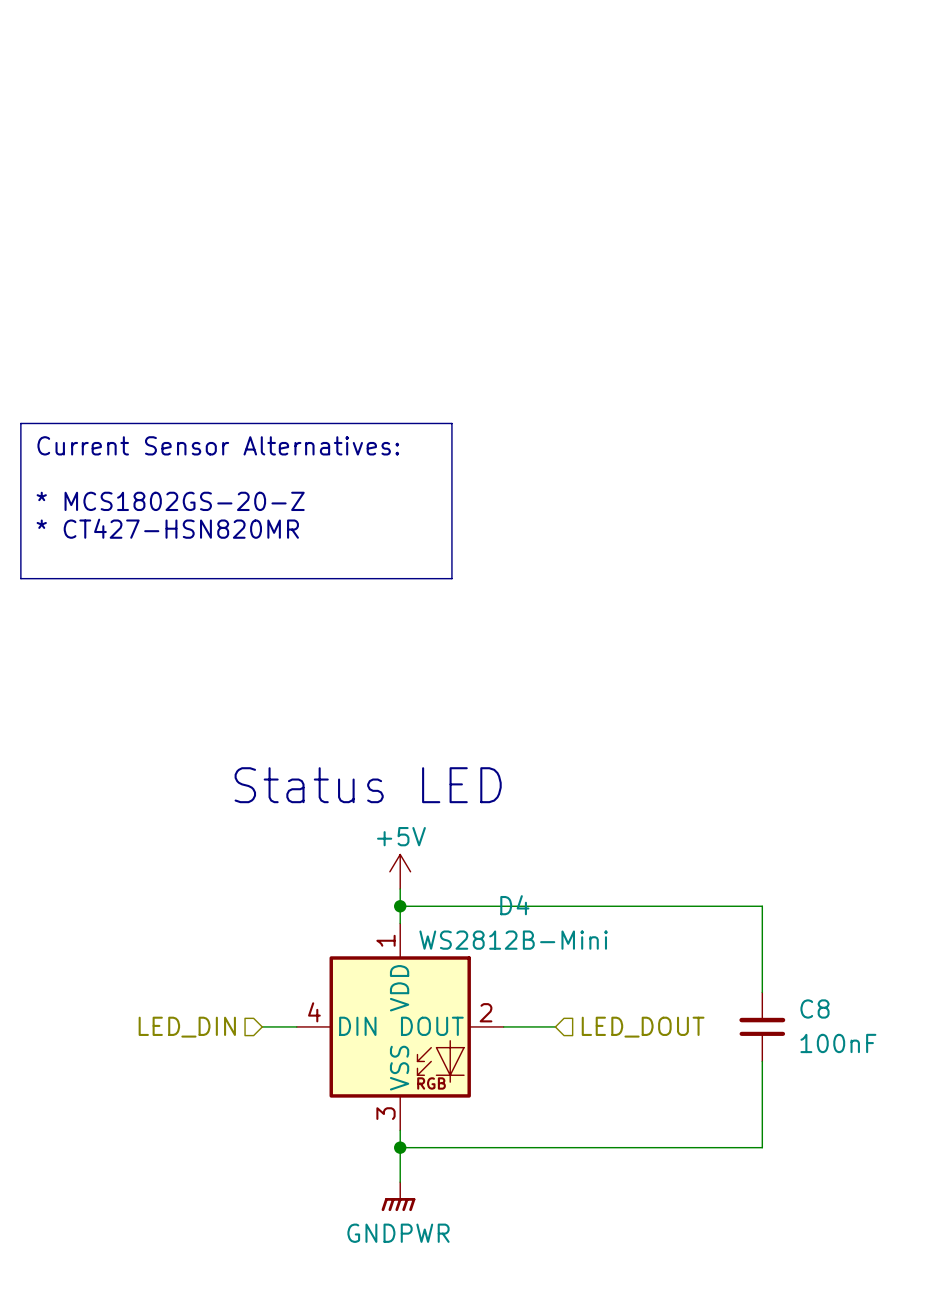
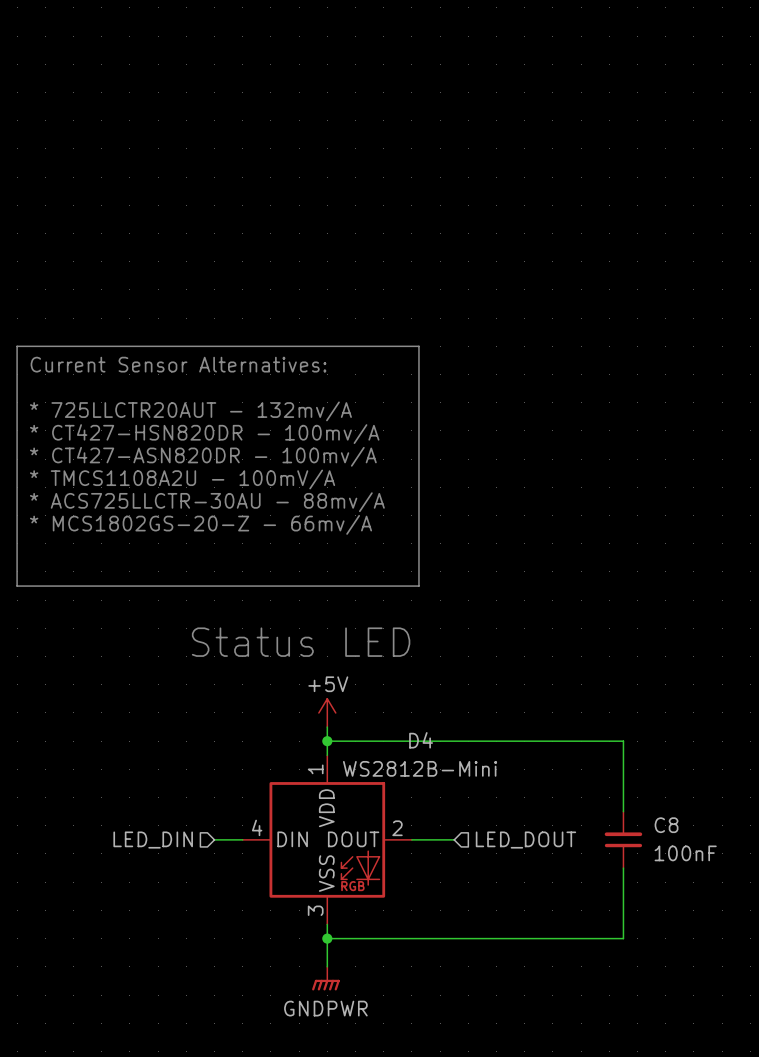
line: (451, 423) (451, 578) (20, 578) -> (369, 346) (418, 346) (418, 586) (17, 586) (17, 473)
text: * MCS1802GS-20-Z (170, 501) -> * 725LLCTR20AUT - 132mv/A (190, 411)
text: * CT427-HSN820MR (167, 528) -> * CT427-HSN820DR - 100mv/A (204, 434)
text: none -> * CT427-ASN820DR - 100mv/A (203, 456)
text: none -> * TMCS1108A2U - 100mV/A (182, 479)
text: none -> * ACS725LLCTR-30AU - 88mv/A (207, 502)
text: none -> * MCS1802GS-20-Z - 66mv/A (201, 524)

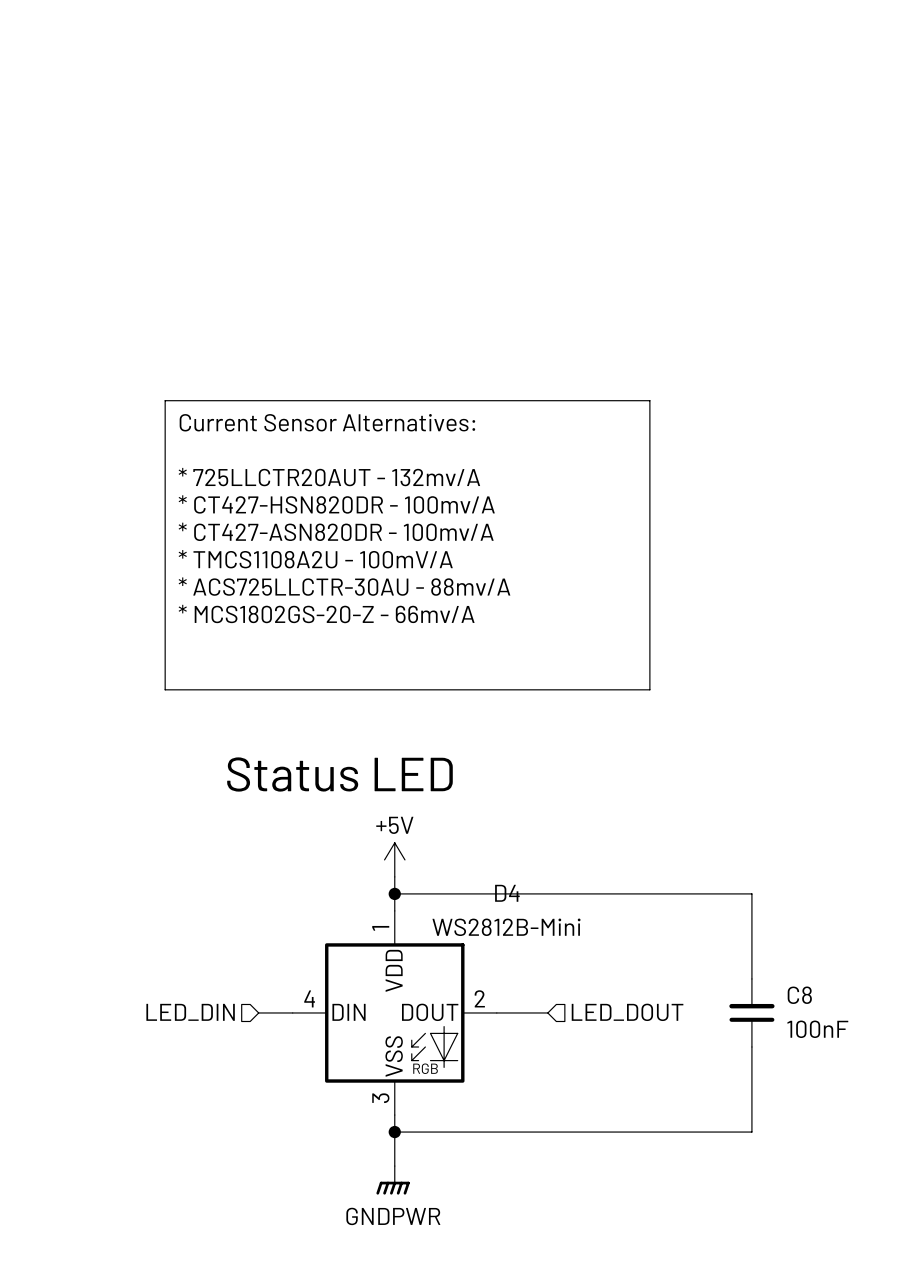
line: (17, 346) (418, 346) (418, 586) (17, 586) (17, 346) -> (165, 400) (649, 400) (649, 689) (165, 689) (165, 400)
text position: Current Sensor Alternatives: (178, 364) -> Current Sensor Alternatives: (327, 422)
text position: * 725LLCTR20AUT - 132mv/A (190, 411) -> * 725LLCTR20AUT - 132mv/A (329, 477)
text position: * CT427-HSN820DR - 100mv/A (204, 434) -> * CT427-HSN820DR - 100mv/A (336, 504)
text position: * CT427-ASN820DR - 100mv/A (203, 456) -> * CT427-ASN820DR - 100mv/A (336, 531)
text position: * TMCS1108A2U - 100mV/A (182, 479) -> * TMCS1108A2U - 100mV/A (315, 559)
text position: * ACS725LLCTR-30AU - 88mv/A (207, 502) -> * ACS725LLCTR-30AU - 88mv/A (344, 586)
text position: * MCS1802GS-20-Z - 66mv/A (201, 524) -> * MCS1802GS-20-Z - 66mv/A (326, 614)

